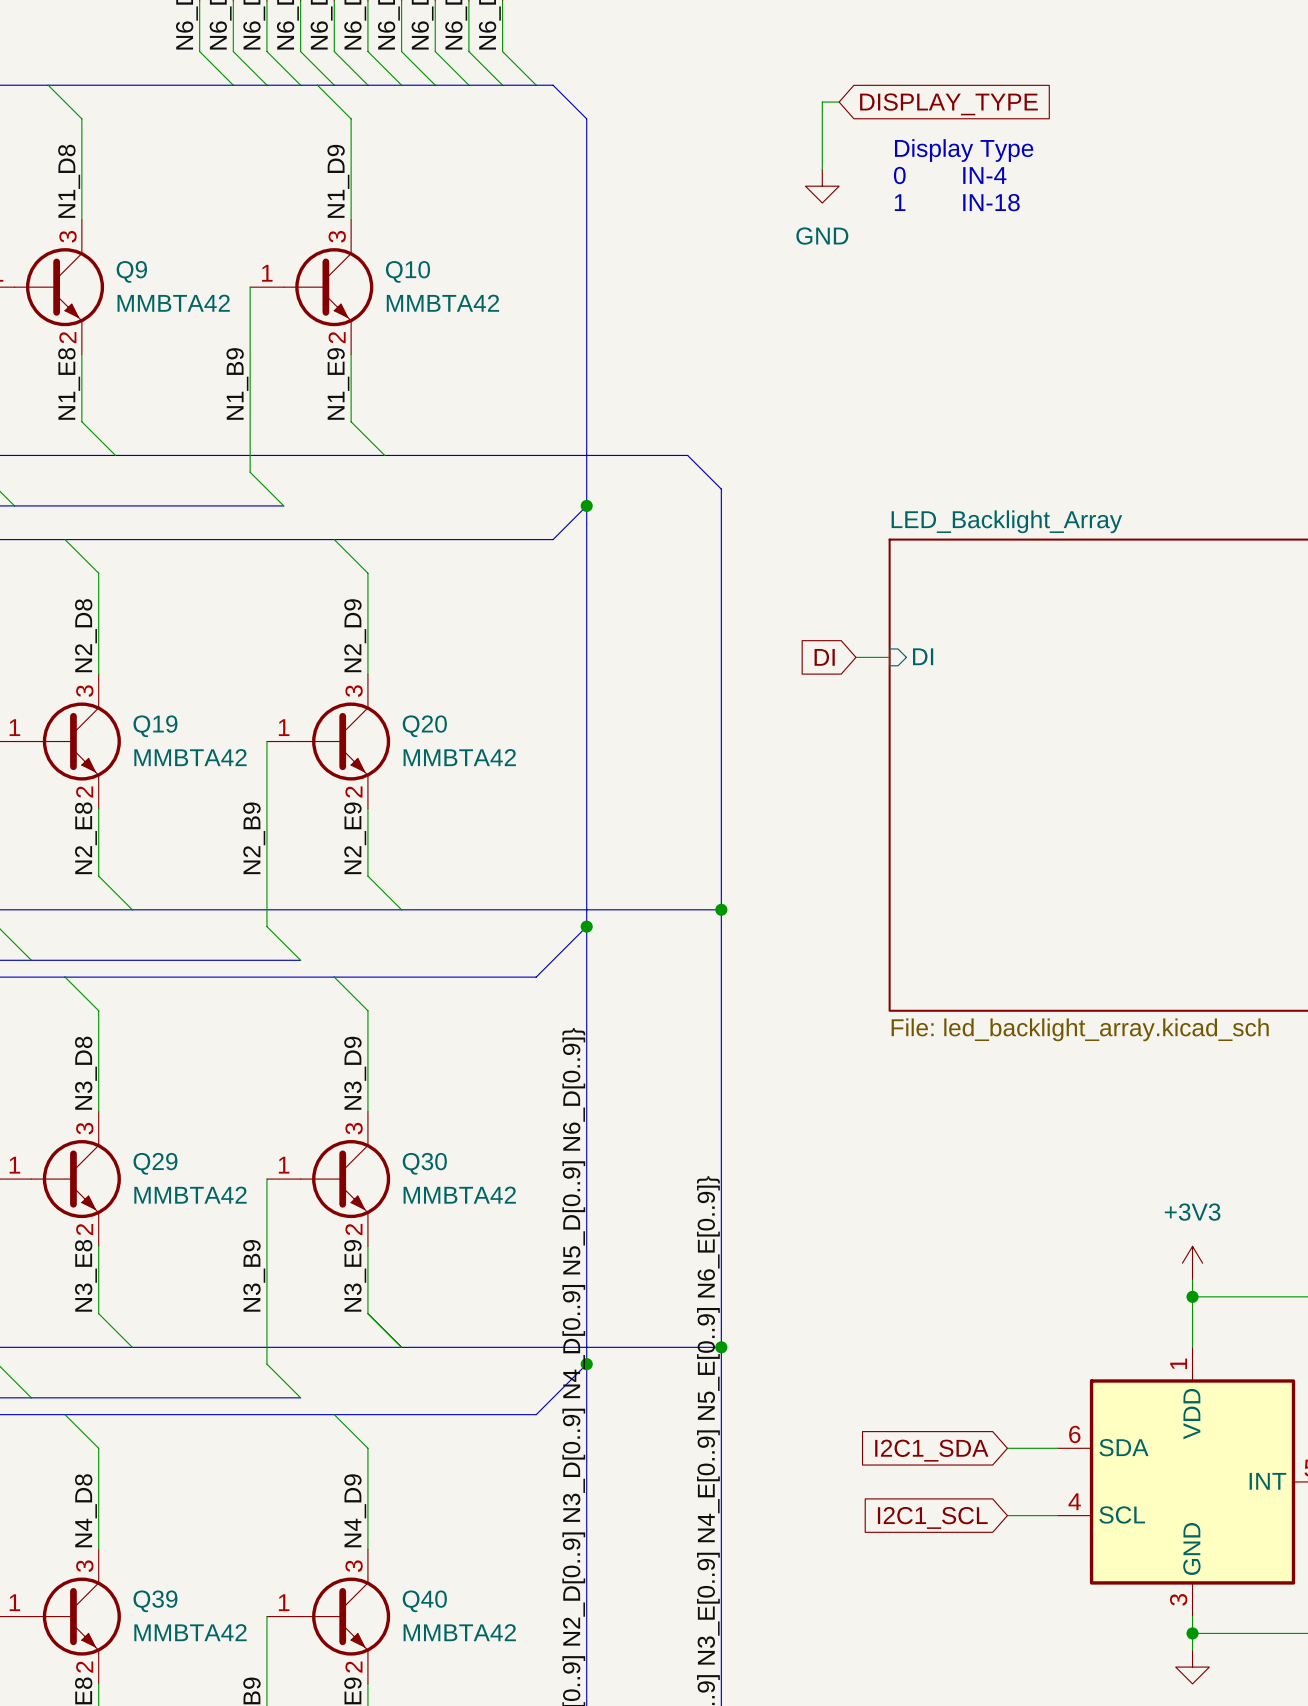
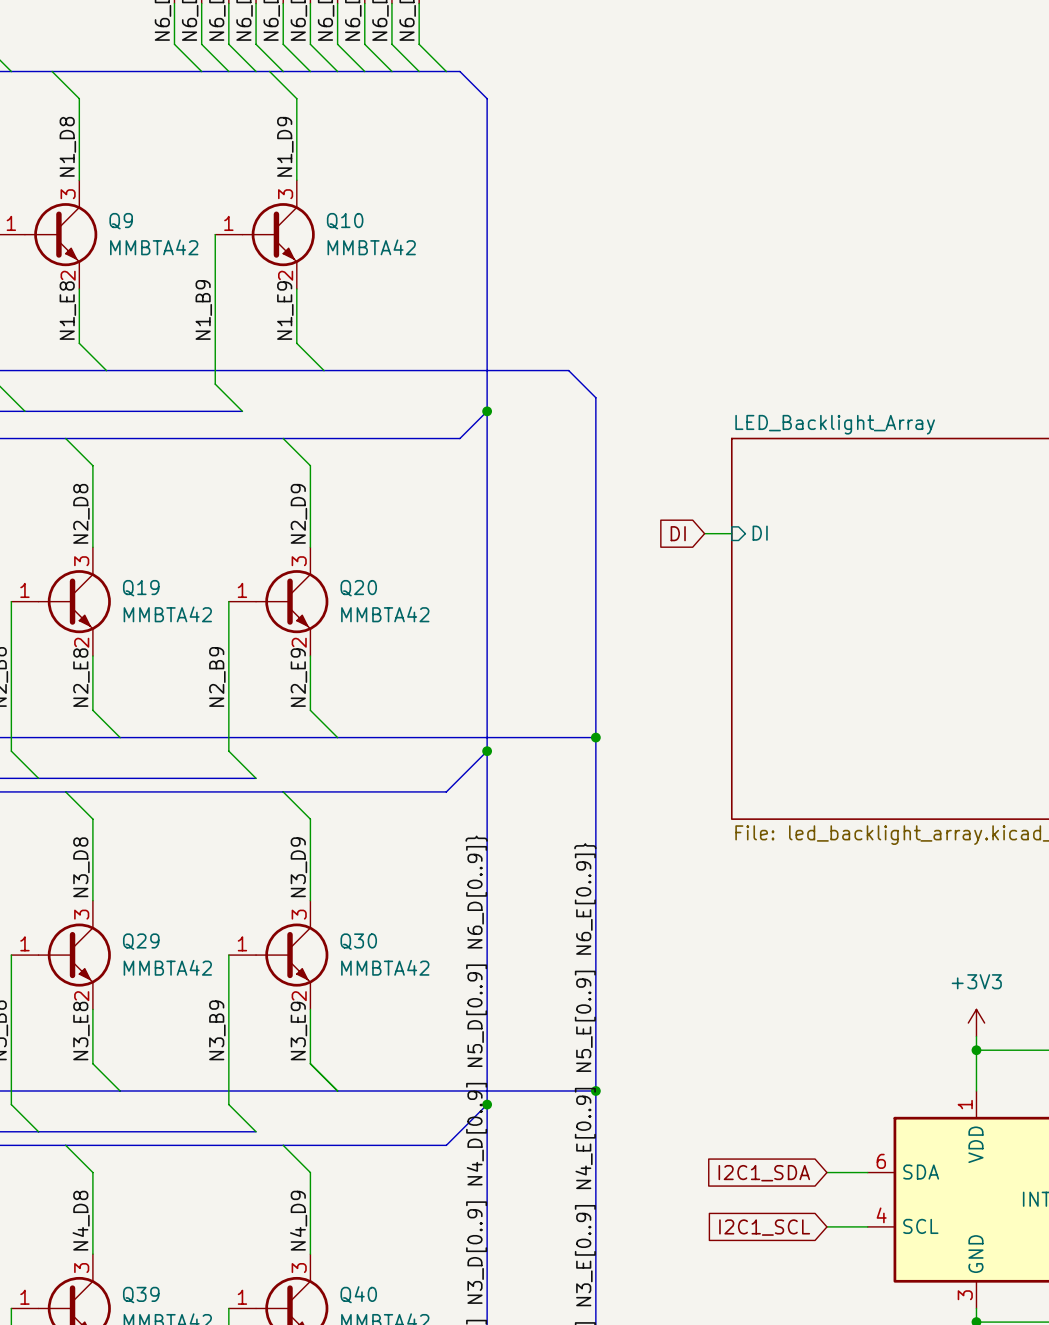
wire: (839, 102) (822, 102) (822, 169) -> none
global label: DISPLAY_TYPE (948, 104) -> none
text: Display Type (964, 150) -> none
text: 0 IN-4 (950, 175) -> none
power symbol: GND (822, 186) -> none
text: 1 IN-18 (957, 202) -> none

